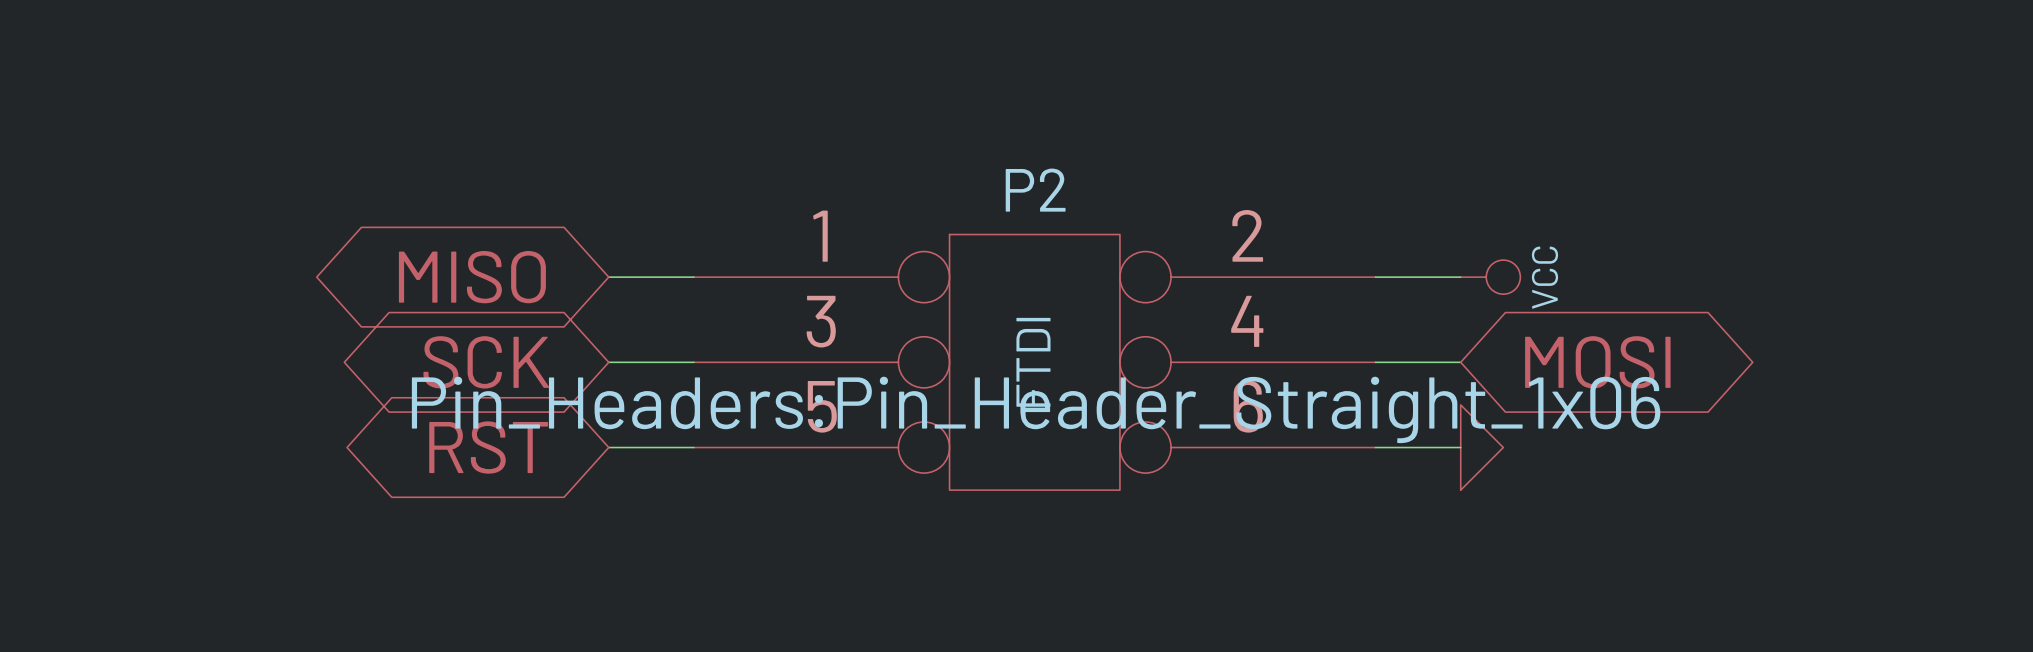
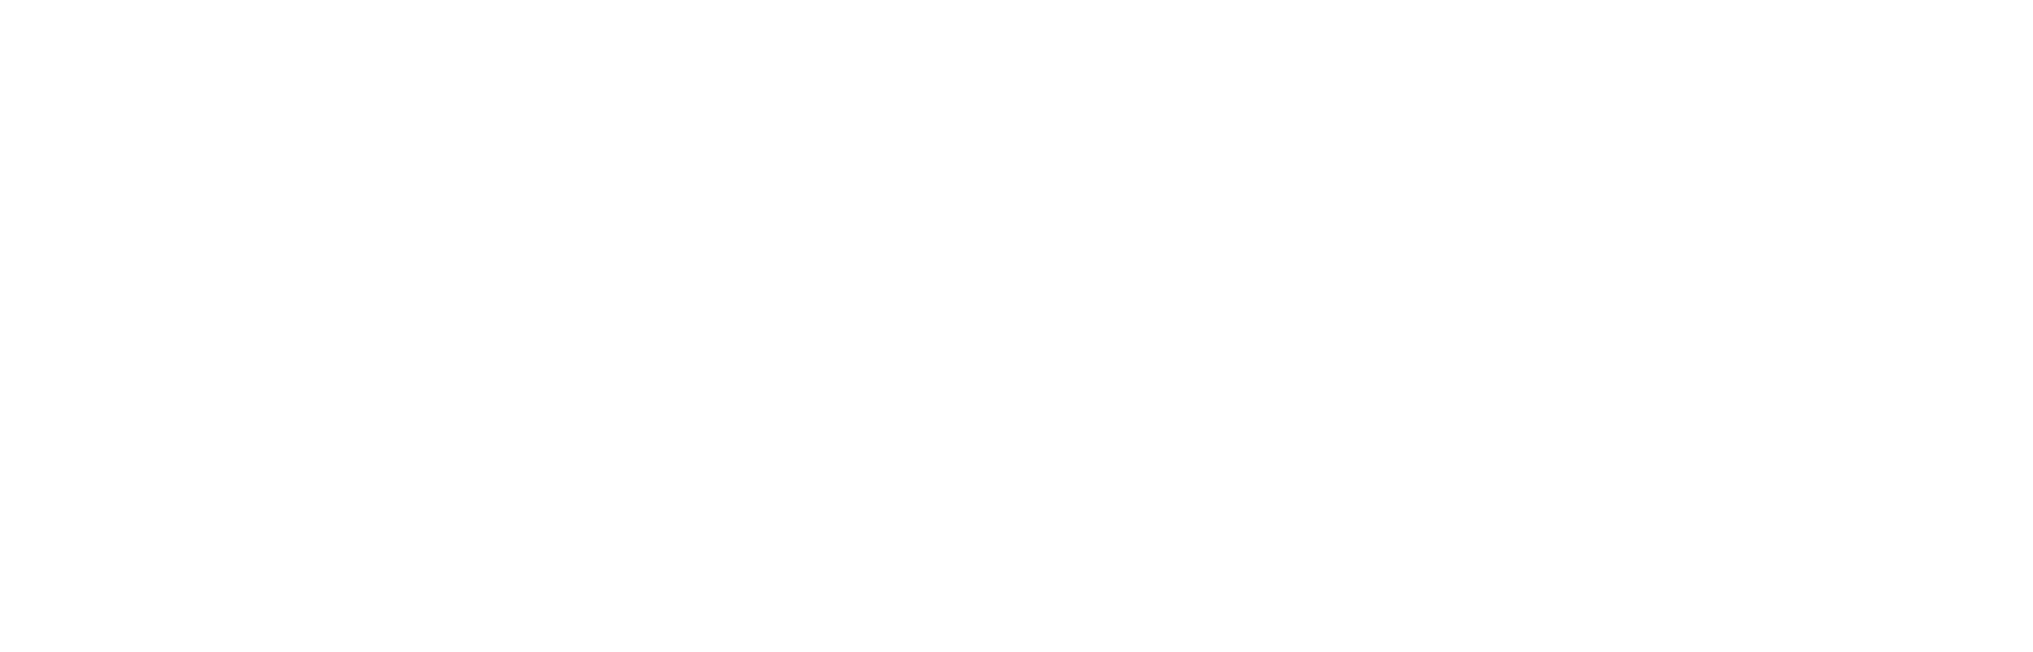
global label: MISO (472, 277) -> none
wire: (608, 277) (693, 277) -> none
wire: (1375, 277) (1460, 277) -> none
power symbol: VCC (1490, 277) -> none
global label: SCK (486, 362) -> none
wire: (608, 362) (693, 362) -> none
P2: FTDI (1034, 362) -> none
wire: (1375, 362) (1460, 362) -> none
global label: MOSI (1597, 362) -> none
global label: RST (488, 447) -> none
wire: (608, 447) (693, 447) -> none
wire: (1375, 447) (1460, 447) -> none
power symbol: (1482, 447) -> none

